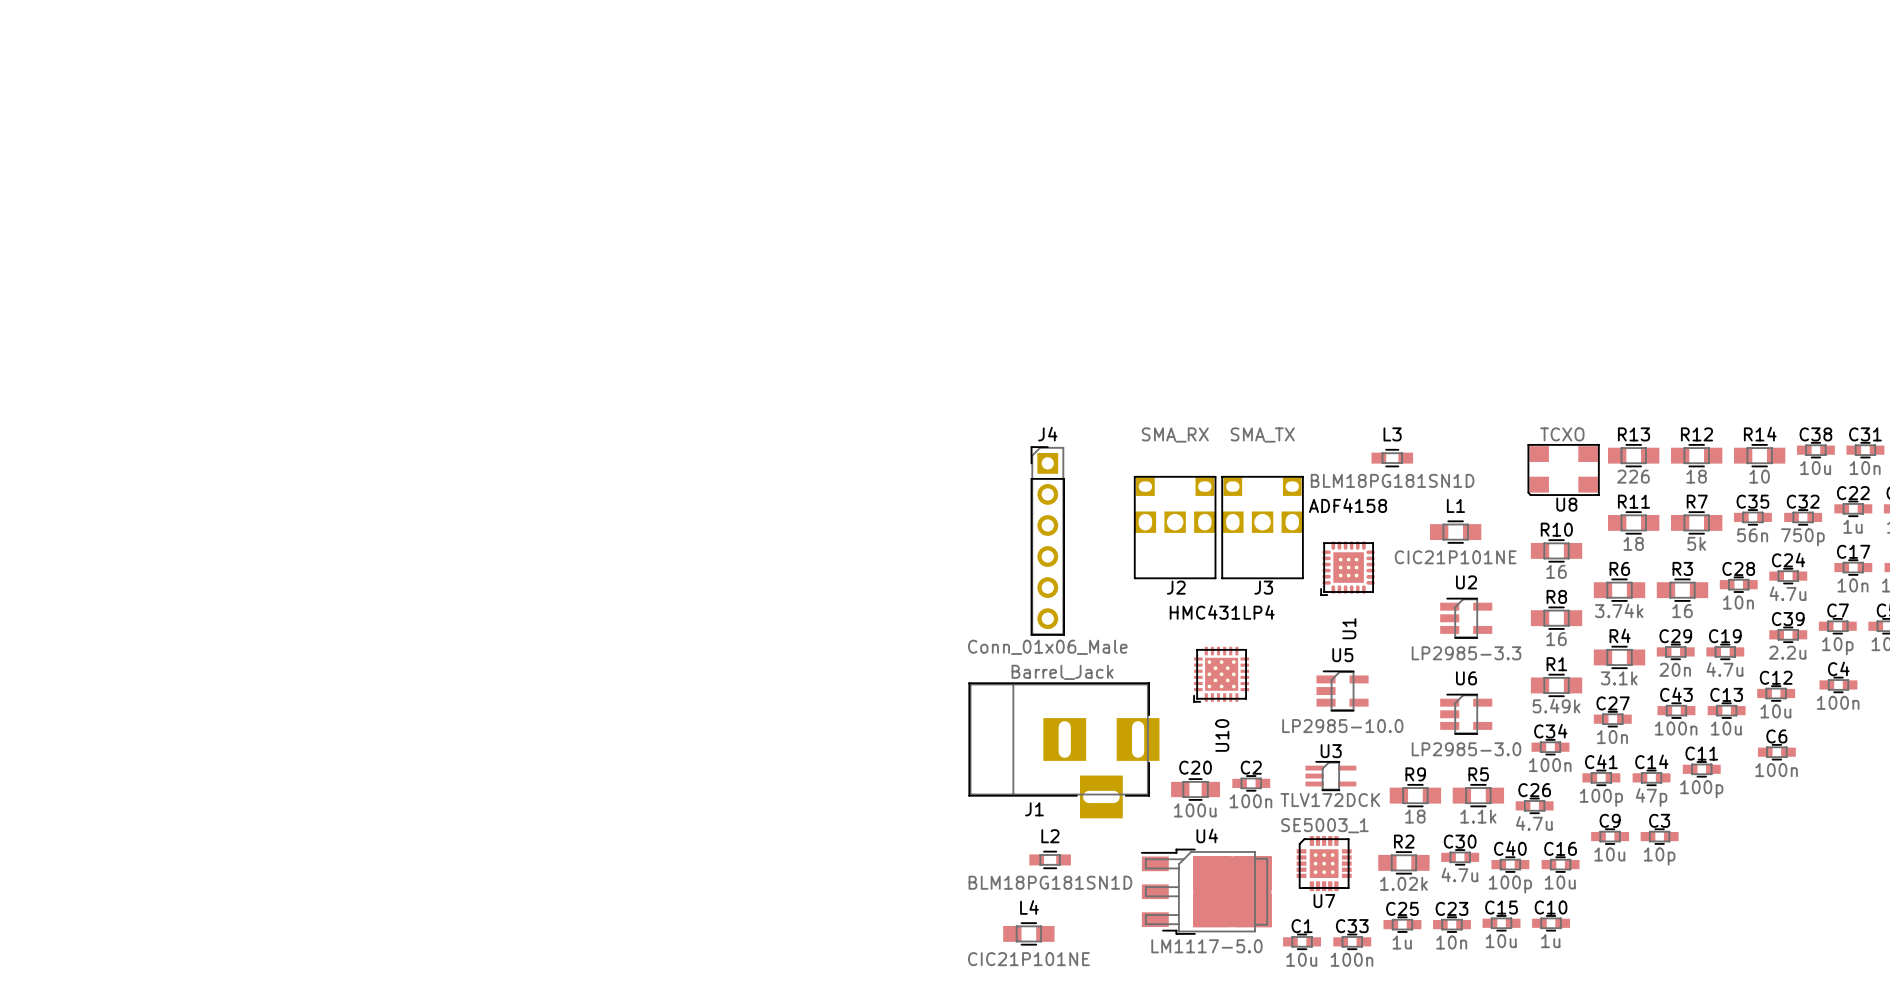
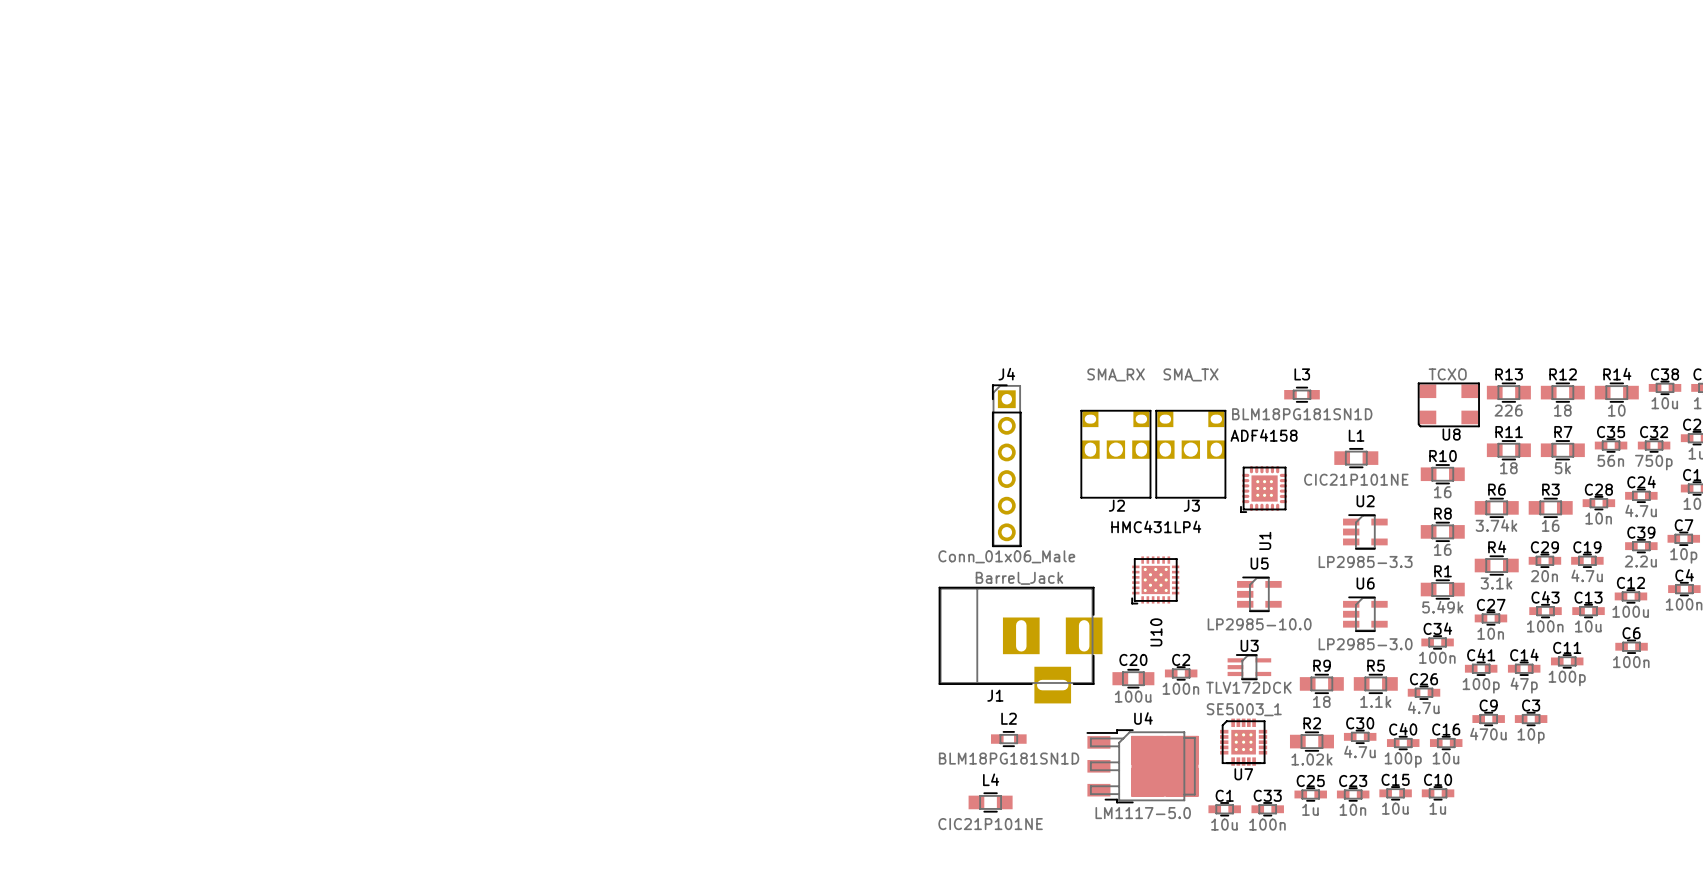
C12 value: 10u (1775, 711) -> 100u (1630, 611)
C9 value: 10u (1609, 854) -> 470u (1488, 734)

